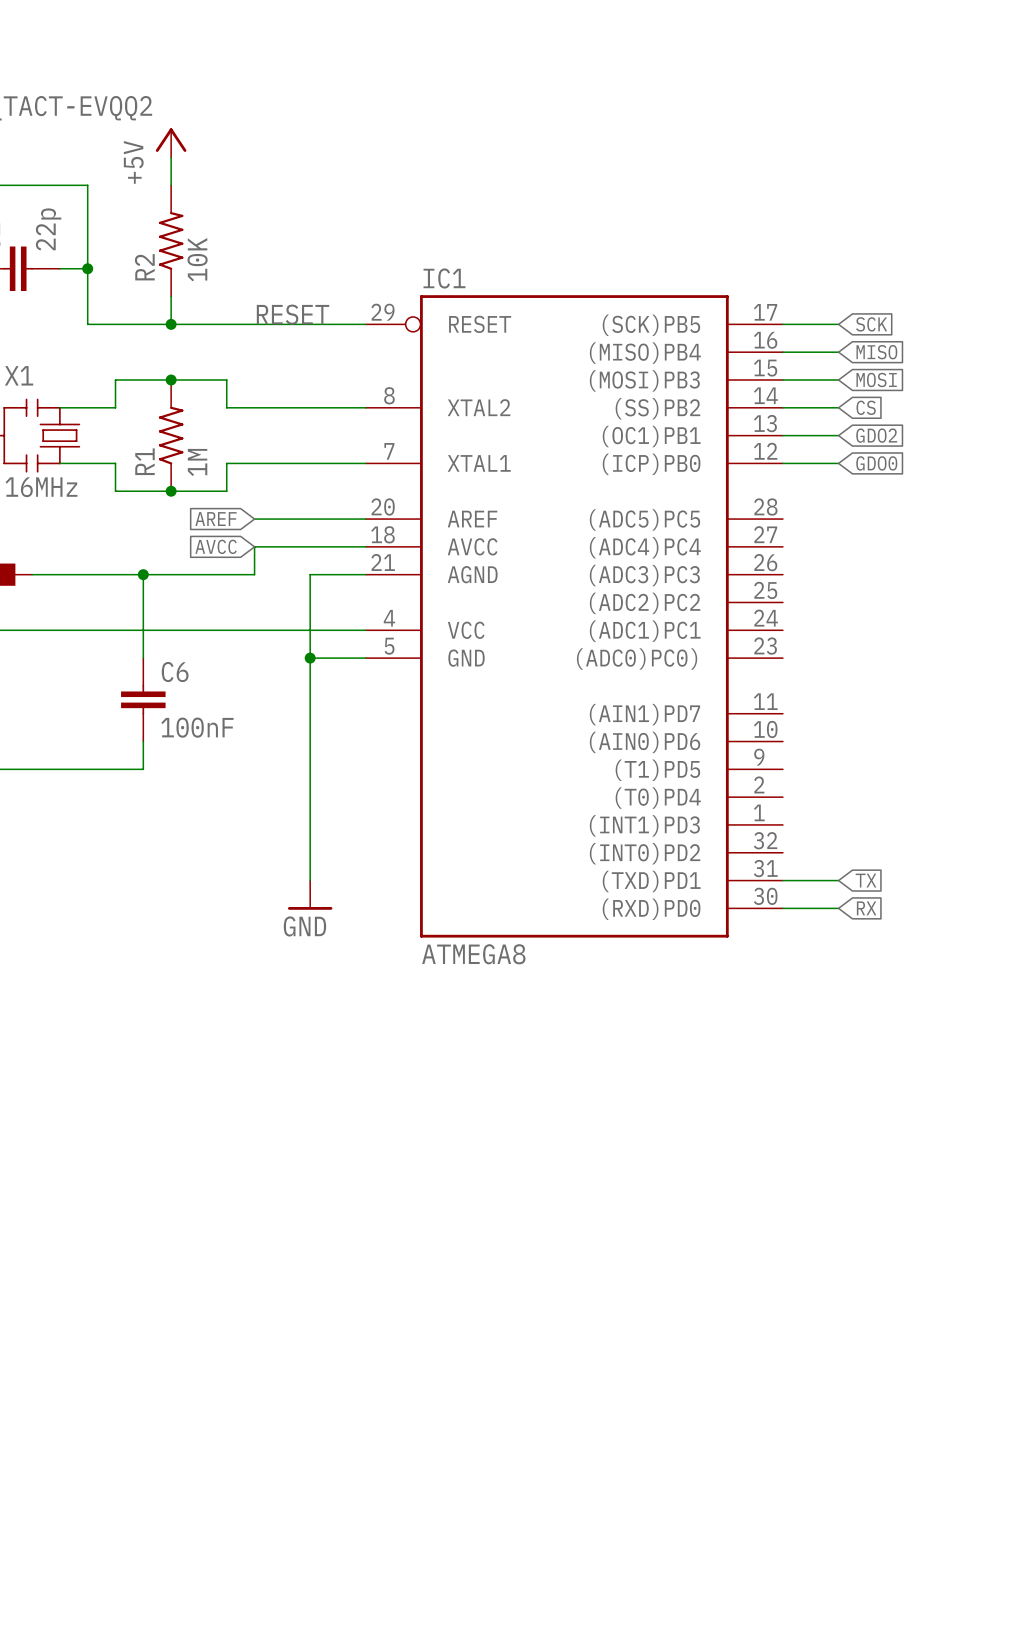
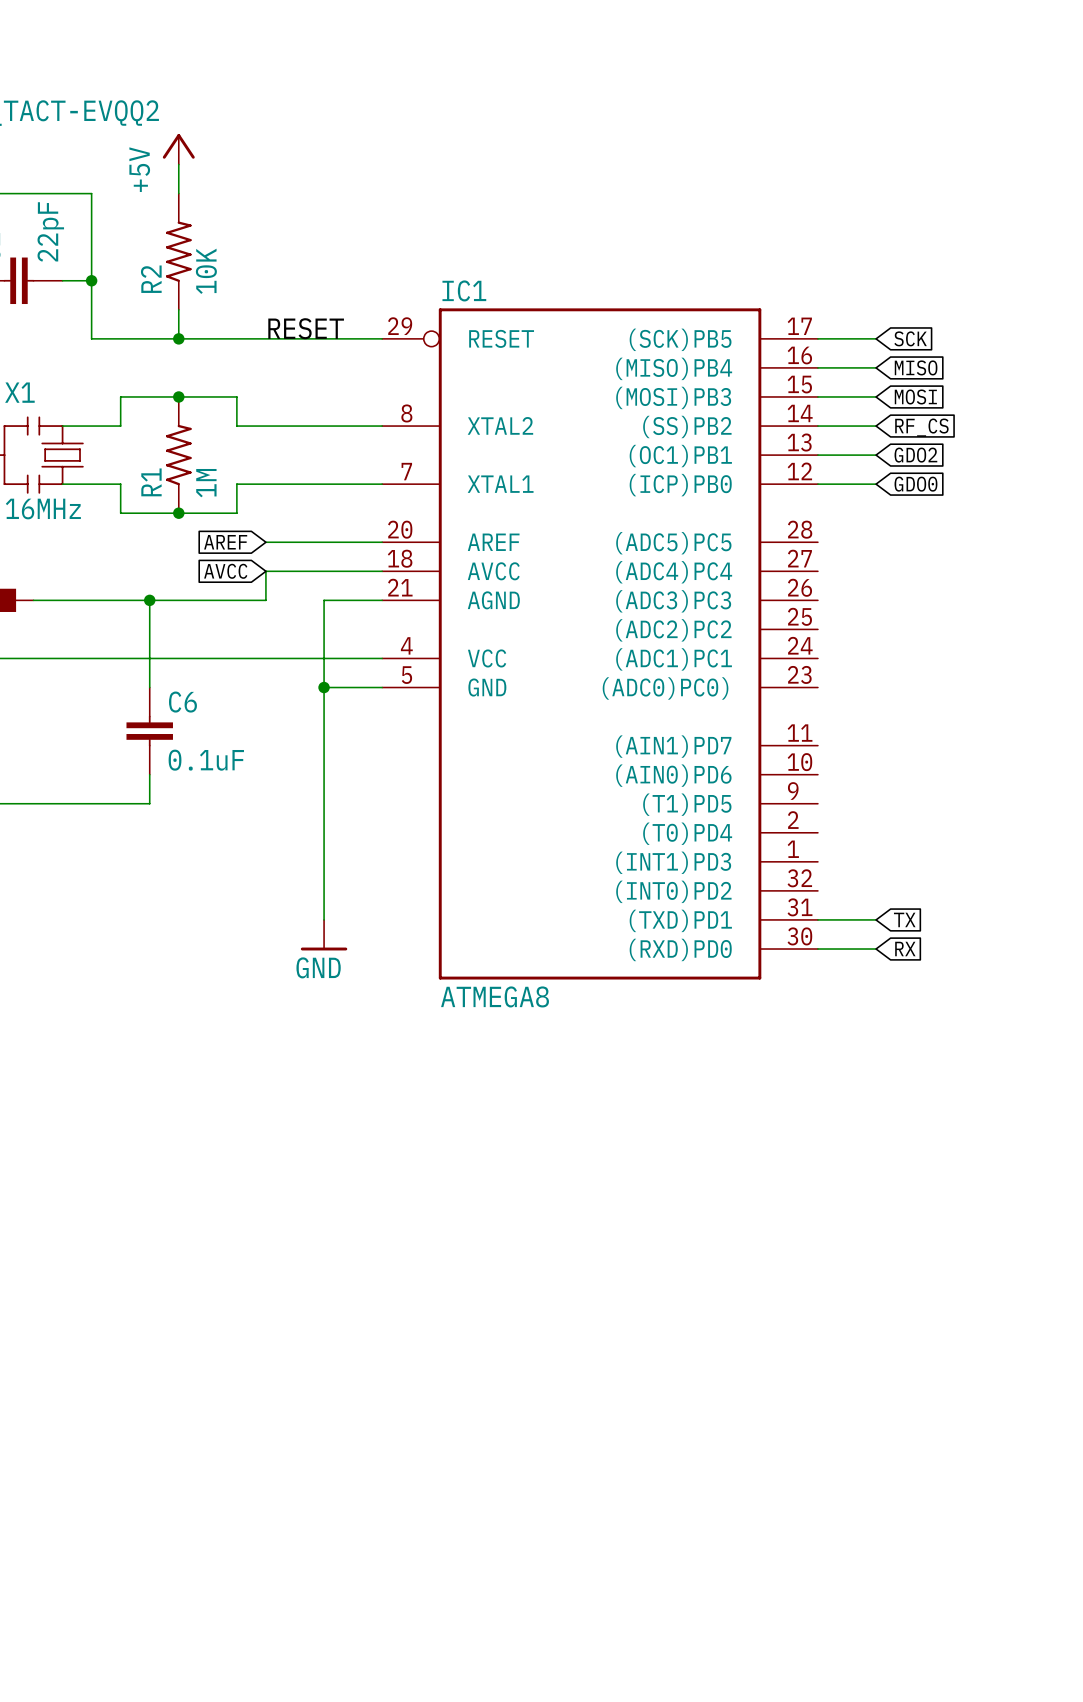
part value: 22p (48, 229) -> 22pF (50, 231)
global label: CS (866, 407) -> RF_CS (921, 427)
C6 value: 100nF (197, 727) -> 0.1uF (206, 760)

